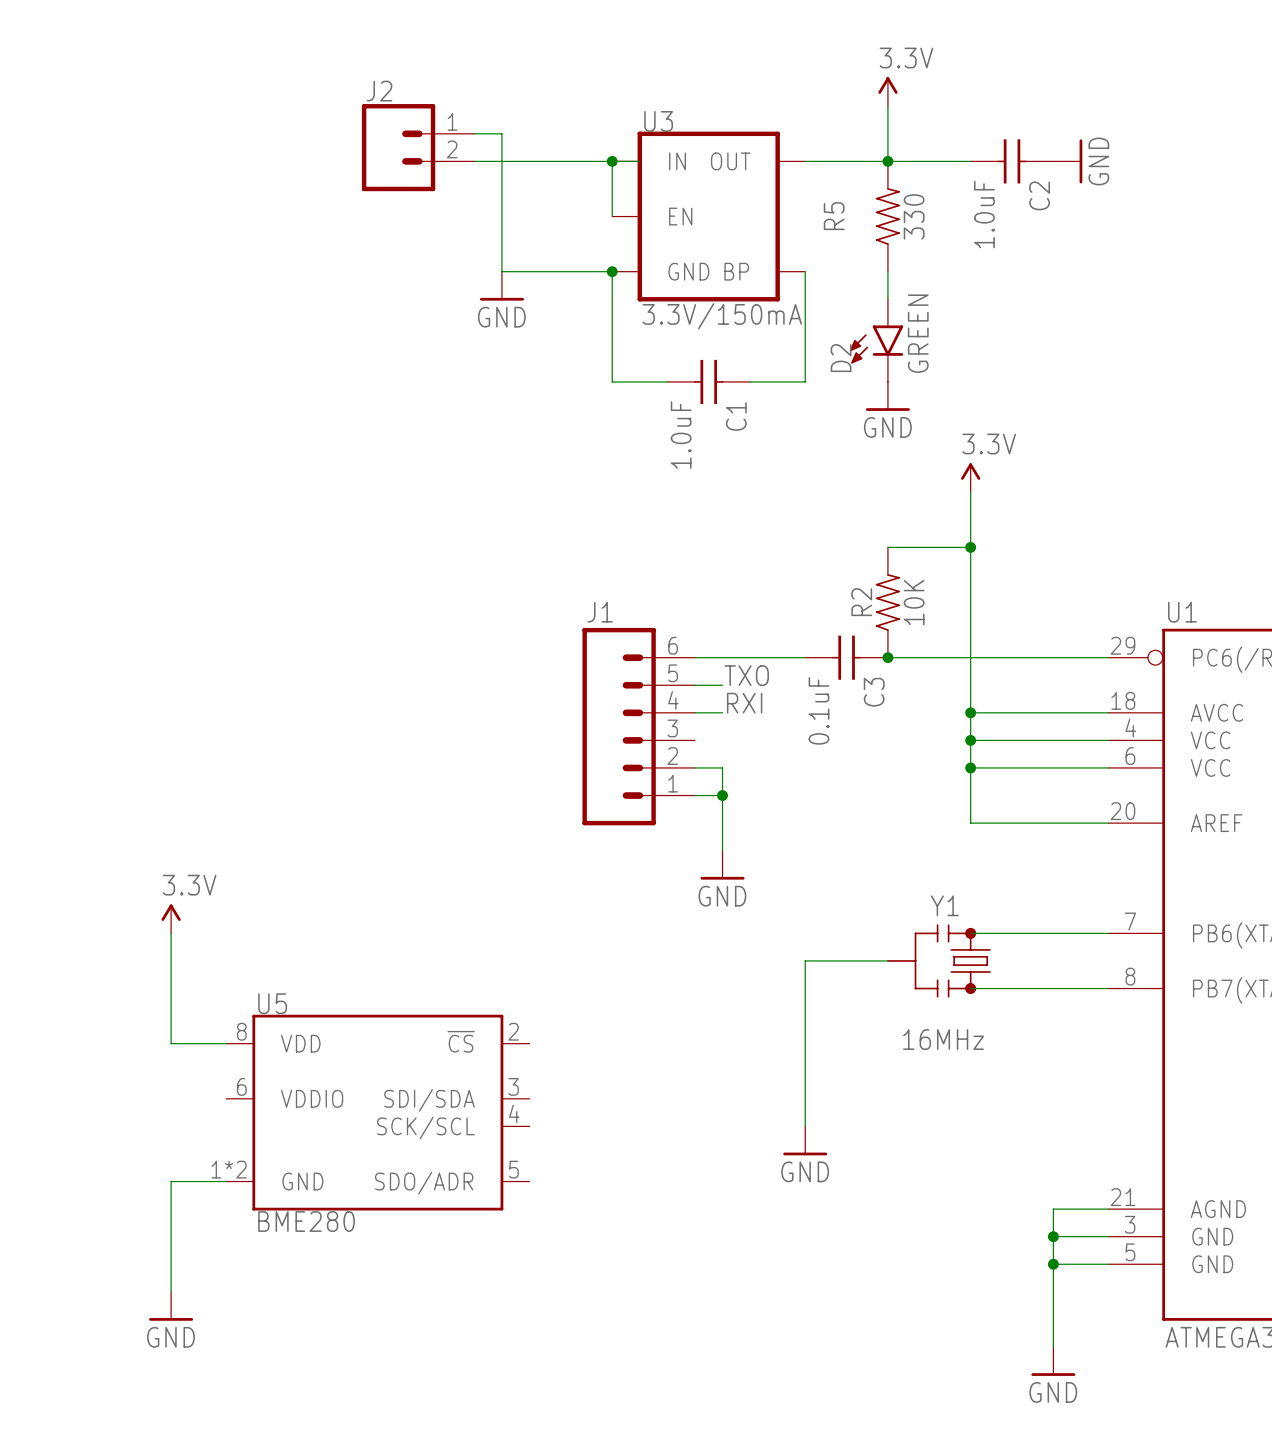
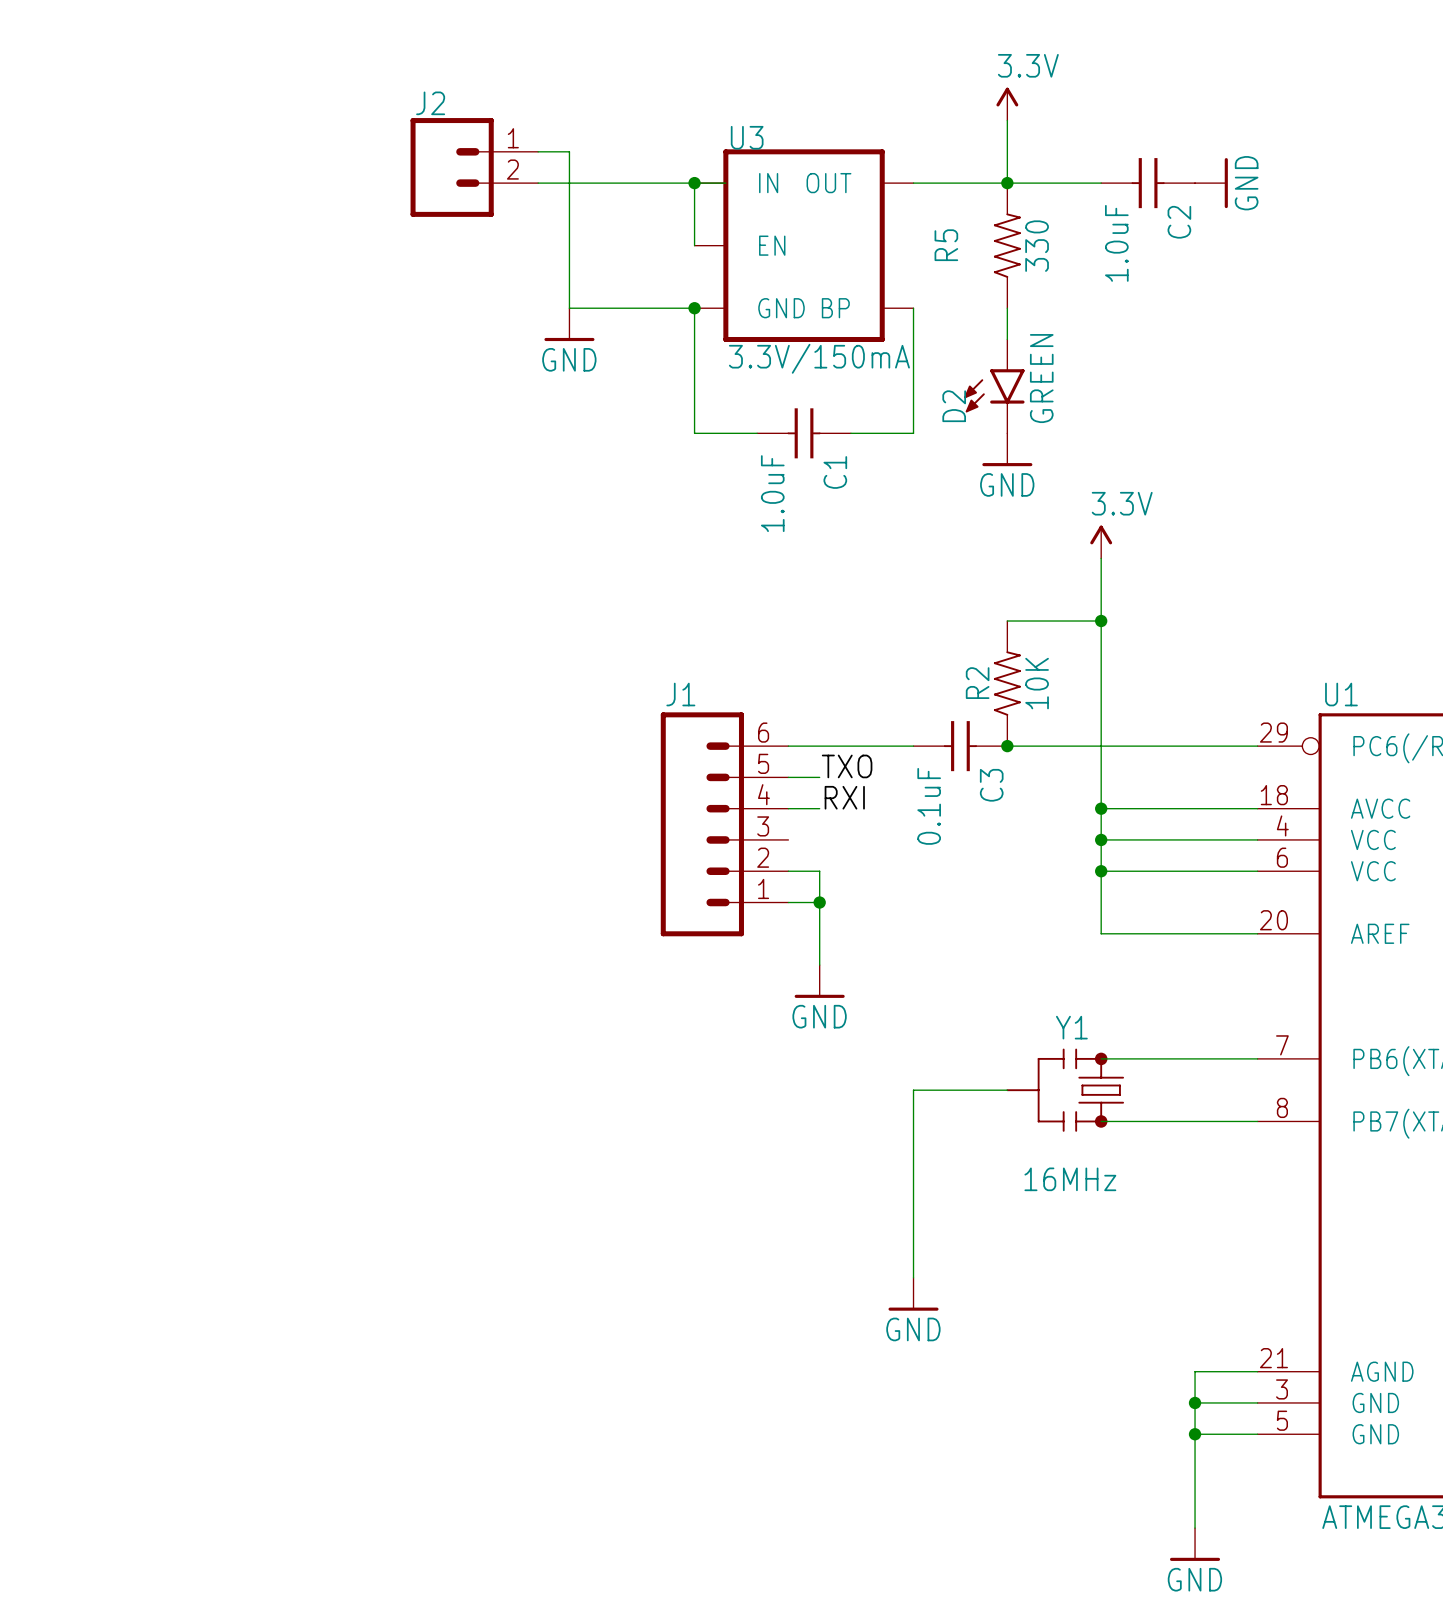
power symbol: 3.3V (171, 918) -> none
wire: (171, 933) (171, 1043) (226, 1043) -> none
U5: BME280 (377, 1112) -> none
wire: (226, 1181) (171, 1181) (171, 1291) -> none
power symbol: GND (171, 1306) -> none

